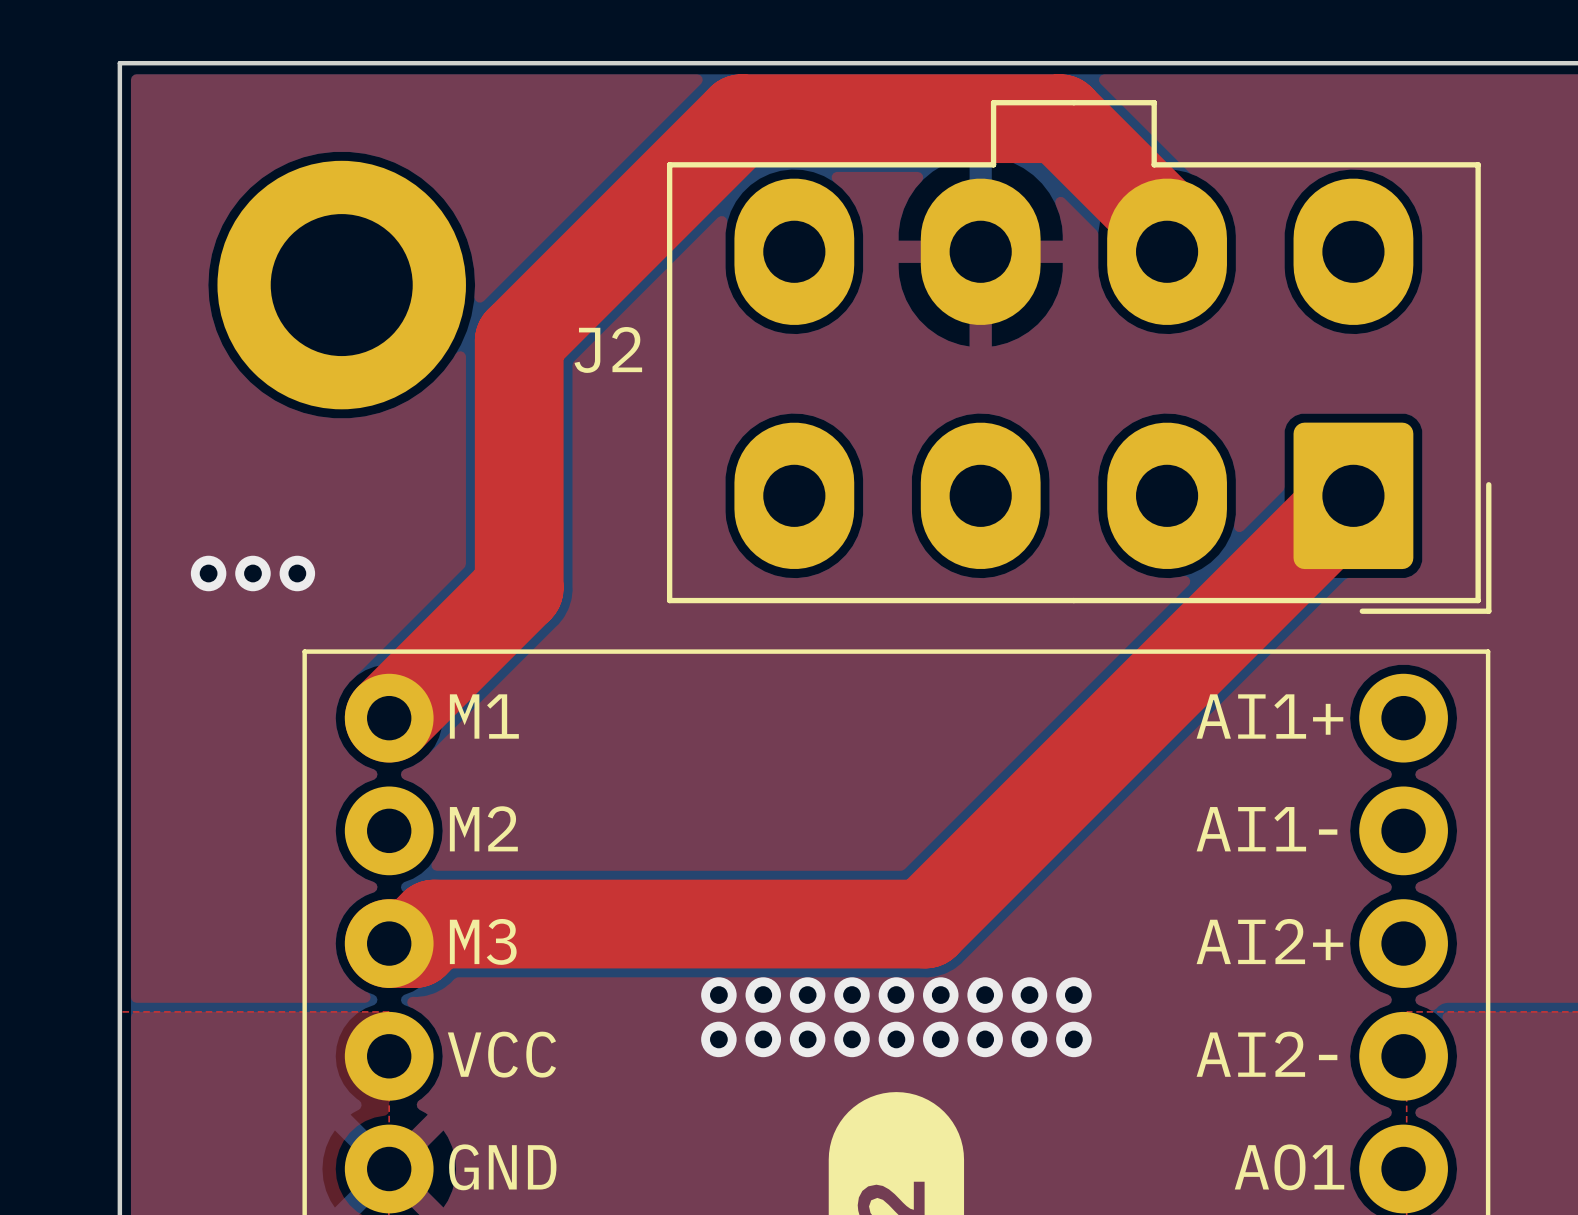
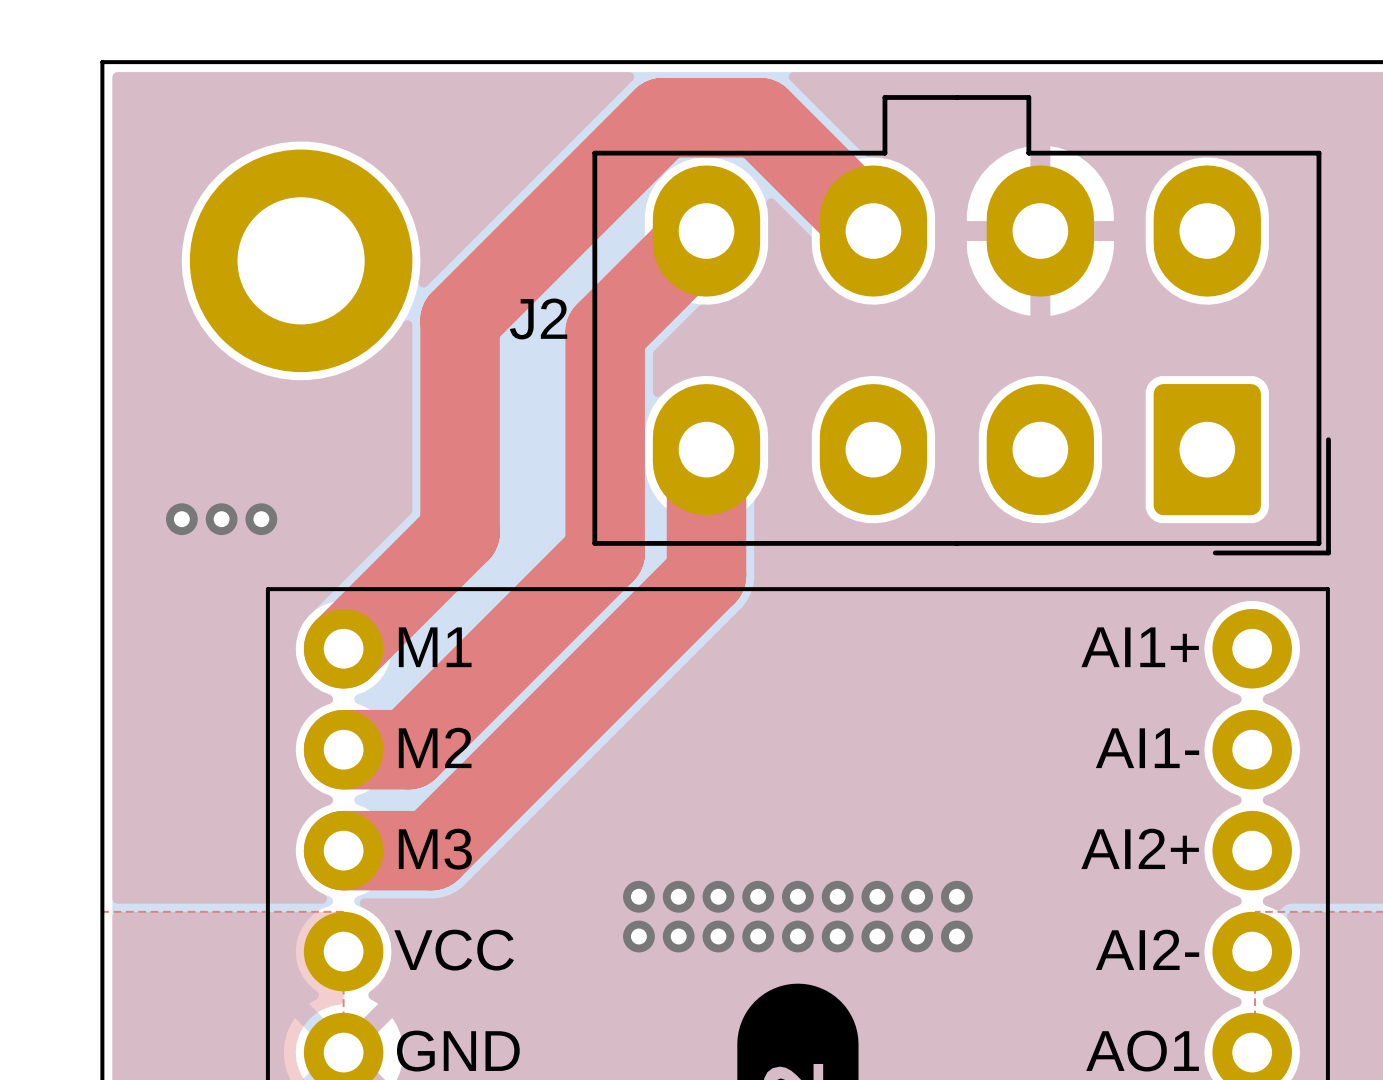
top track: none -> (706, 231) (605, 332) (605, 552) (408, 749) (343, 749)
top track: (1167, 251) (1167, 225) (1060, 118) (741, 118) (519, 340) (519, 351) -> (873, 231) (760, 117) (662, 117) (460, 320)
top track: (1353, 495) (925, 924) (434, 924) (414, 943) -> (706, 449) (706, 575) (431, 850) (366, 850)

